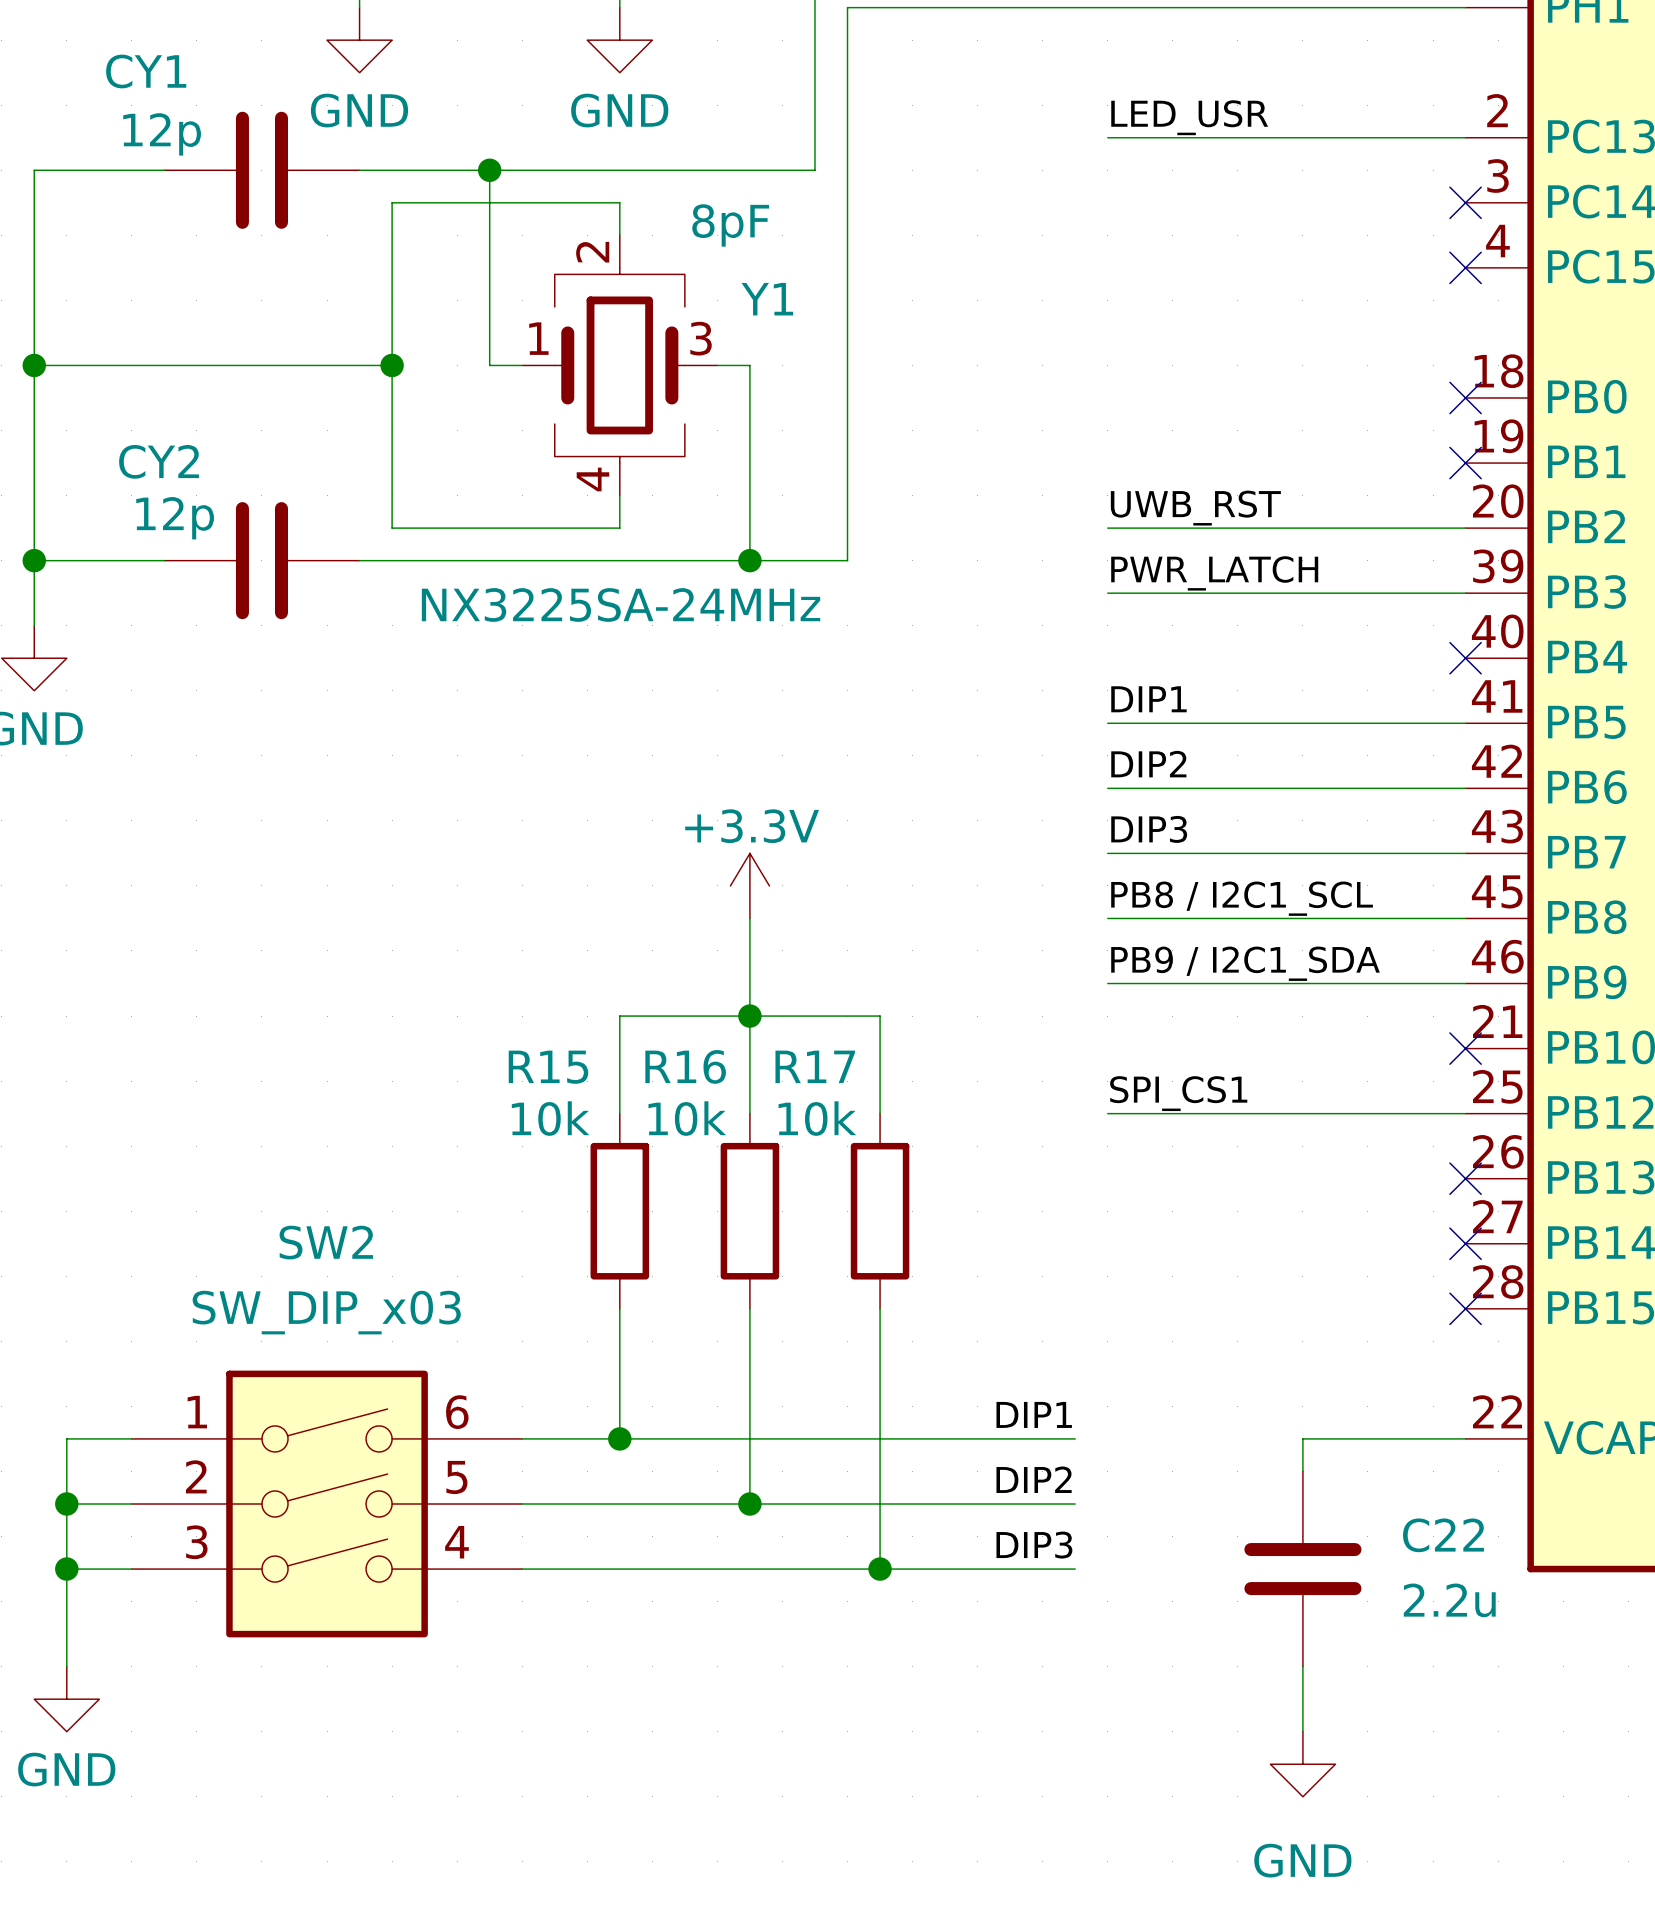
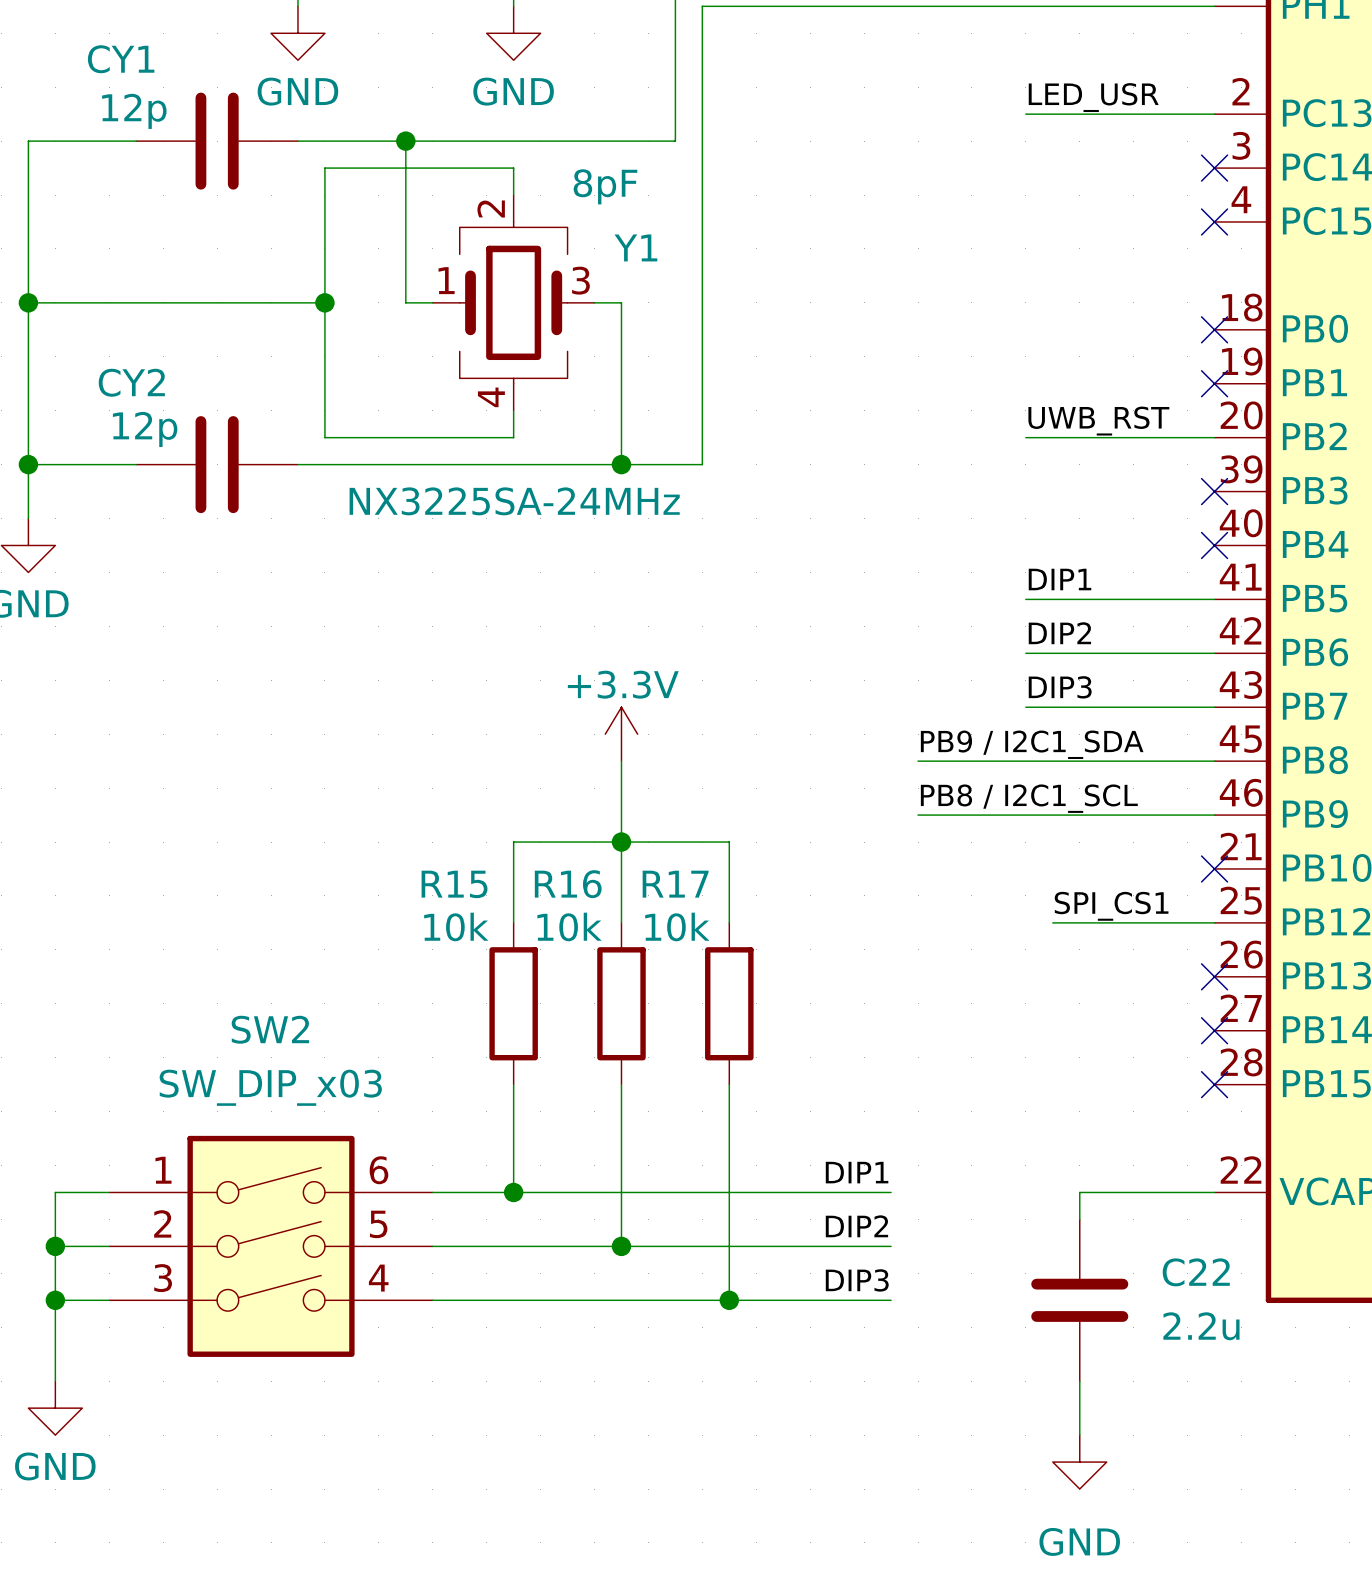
label position: LED_USR (1189, 117) -> LED_USR (1093, 97)
wire: (1107, 137) (1237, 137) -> none
label position: UWB_RST (1195, 508) -> UWB_RST (1098, 421)
wire: (1107, 528) (1237, 528) -> none
label: PWR_LATCH (1214, 573) -> none
wire: (1107, 593) (1465, 593) -> none
no-connect mark: none -> (1214, 491)
label position: DIP1 (1148, 699) -> DIP1 (1060, 579)
wire: (1107, 723) (1237, 723) -> none
label position: DIP2 (1148, 764) -> DIP2 (1059, 633)
wire: (1107, 788) (1237, 788) -> none
label position: DIP3 (1149, 829) -> DIP3 (1060, 687)
wire: (1107, 853) (1237, 853) -> none
label: PB8 / I2C1_SCL (1242, 898) -> PB9 / I2C1_SDA (1032, 744)
label: PB9 / I2C1_SDA (1245, 963) -> PB8 / I2C1_SCL (1029, 798)
label position: SPI_CS1 (1178, 1093) -> SPI_CS1 (1111, 906)
wire: (1107, 1113) (1270, 1113) -> none

